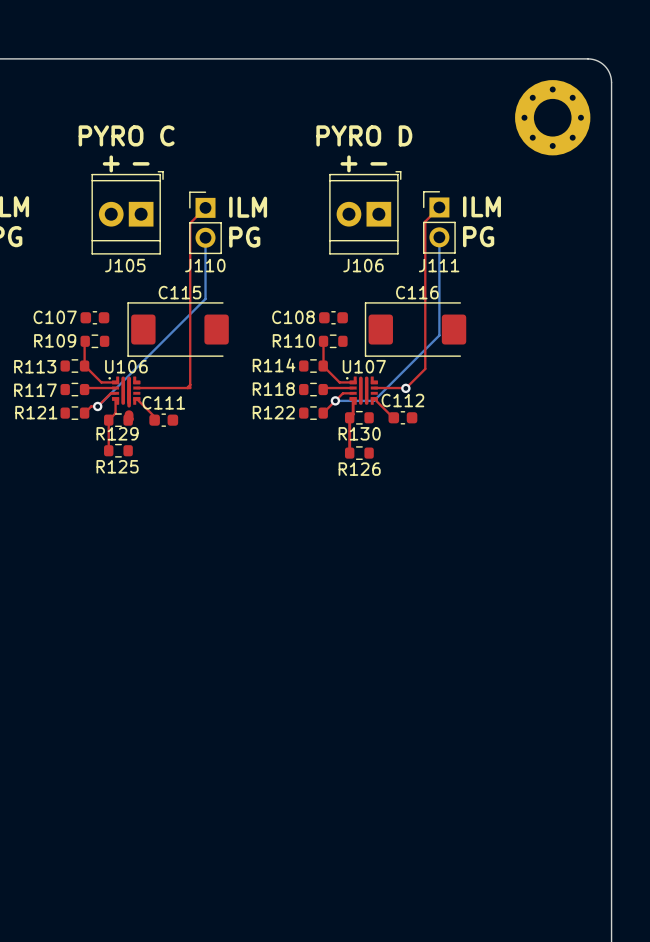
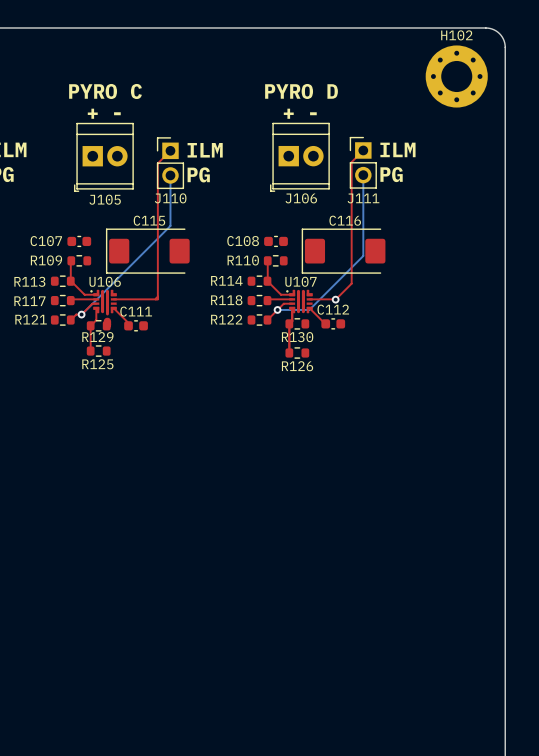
H102 name: none -> H102 (456, 35)
J105 rotation: 0° (127, 212) -> 180° (103, 157)
J106 rotation: 0° (365, 212) -> 180° (299, 157)

